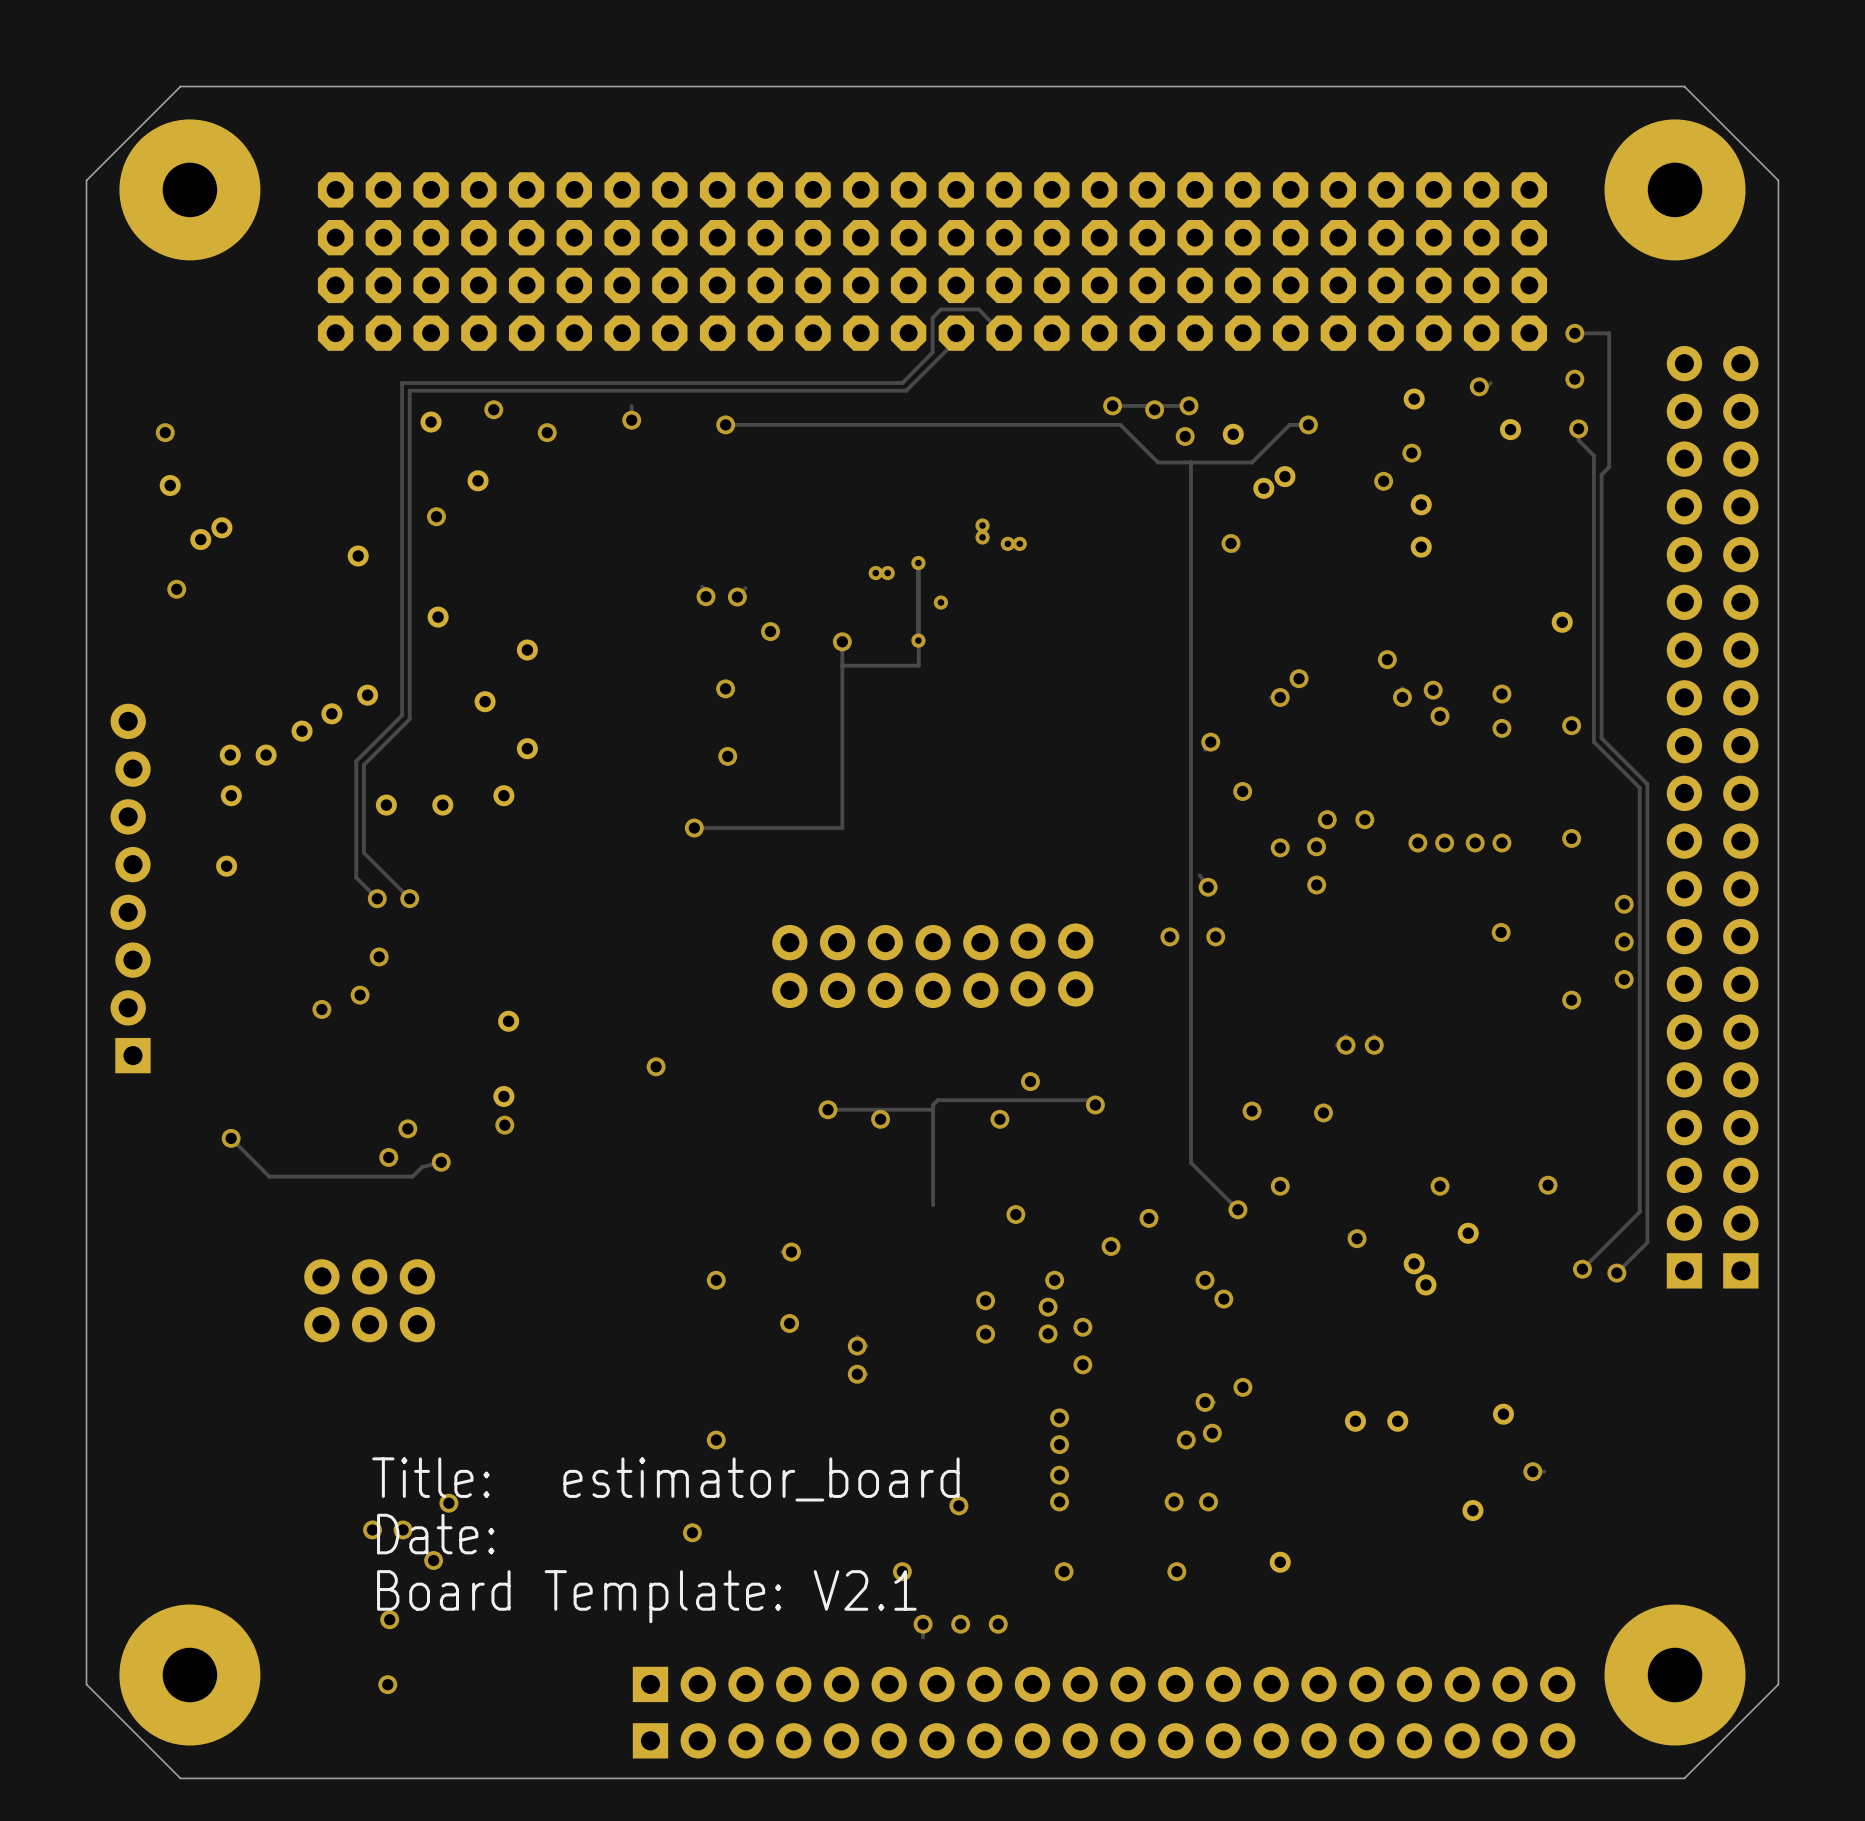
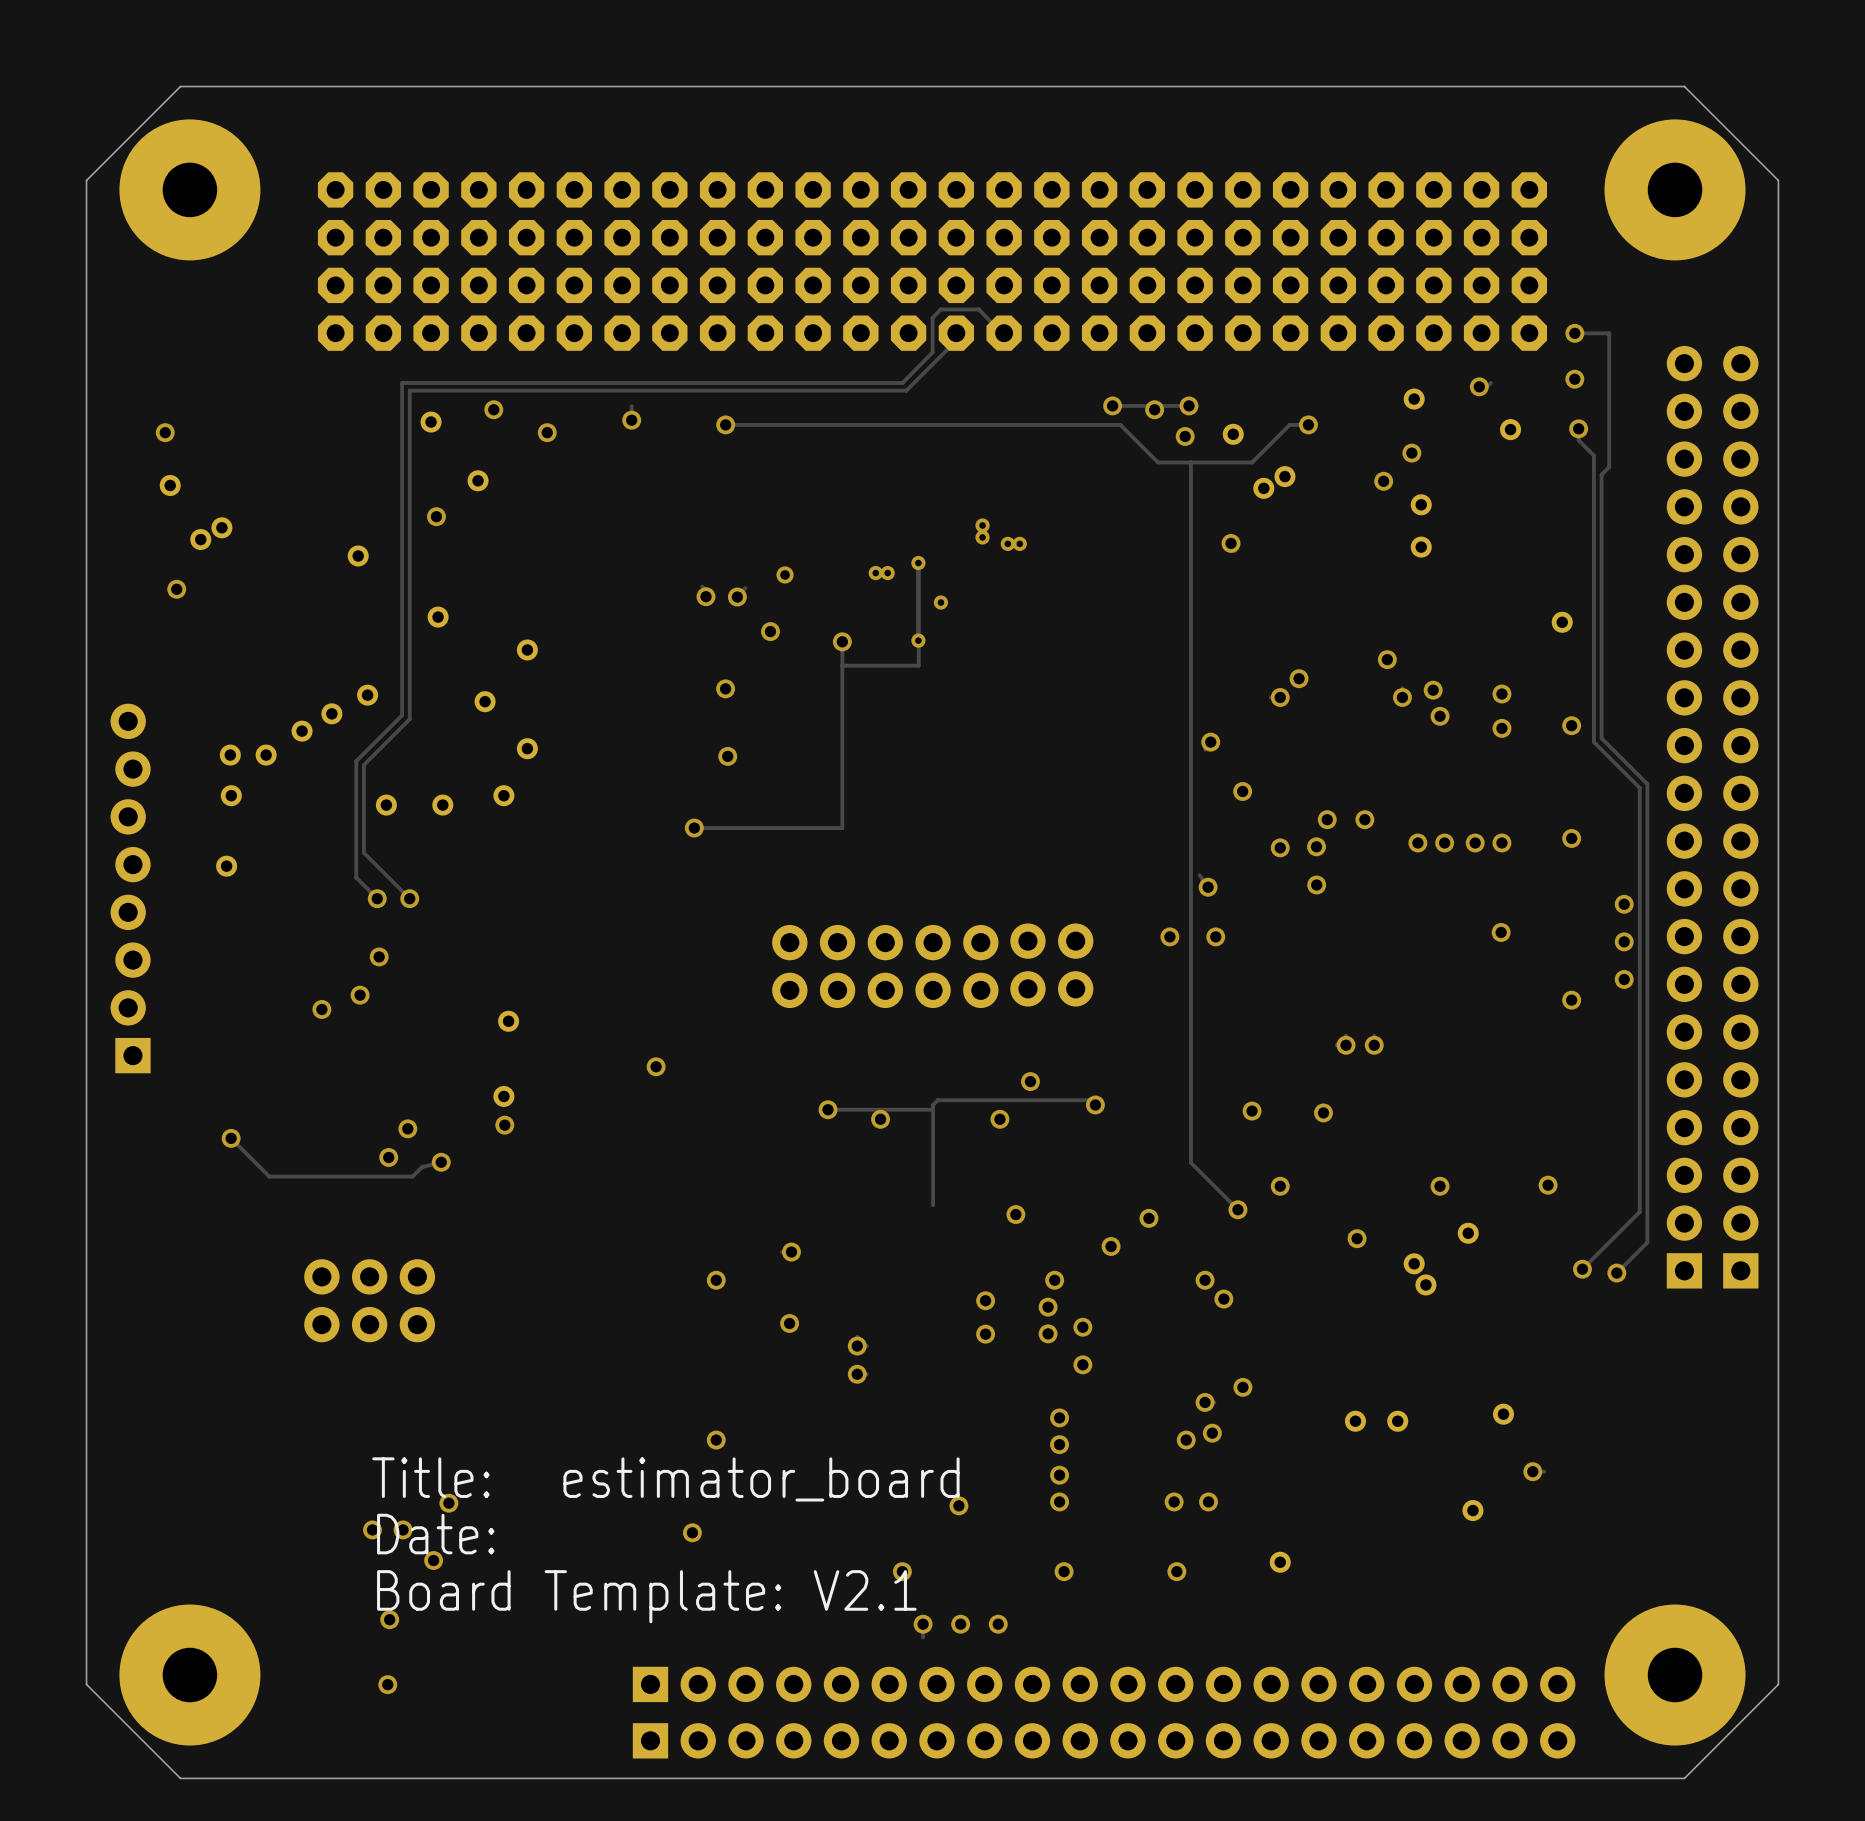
via: none -> (785, 574)

